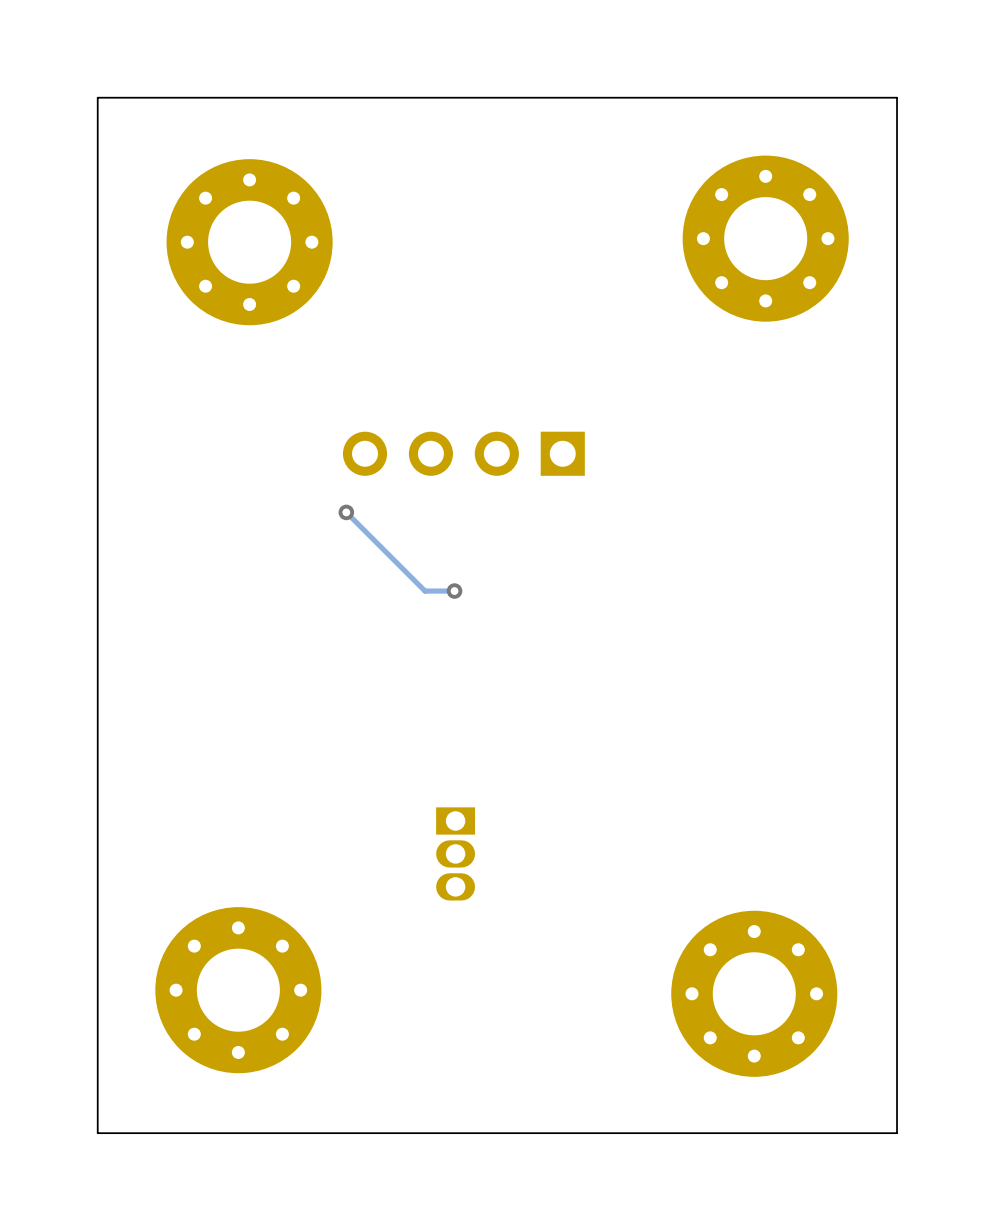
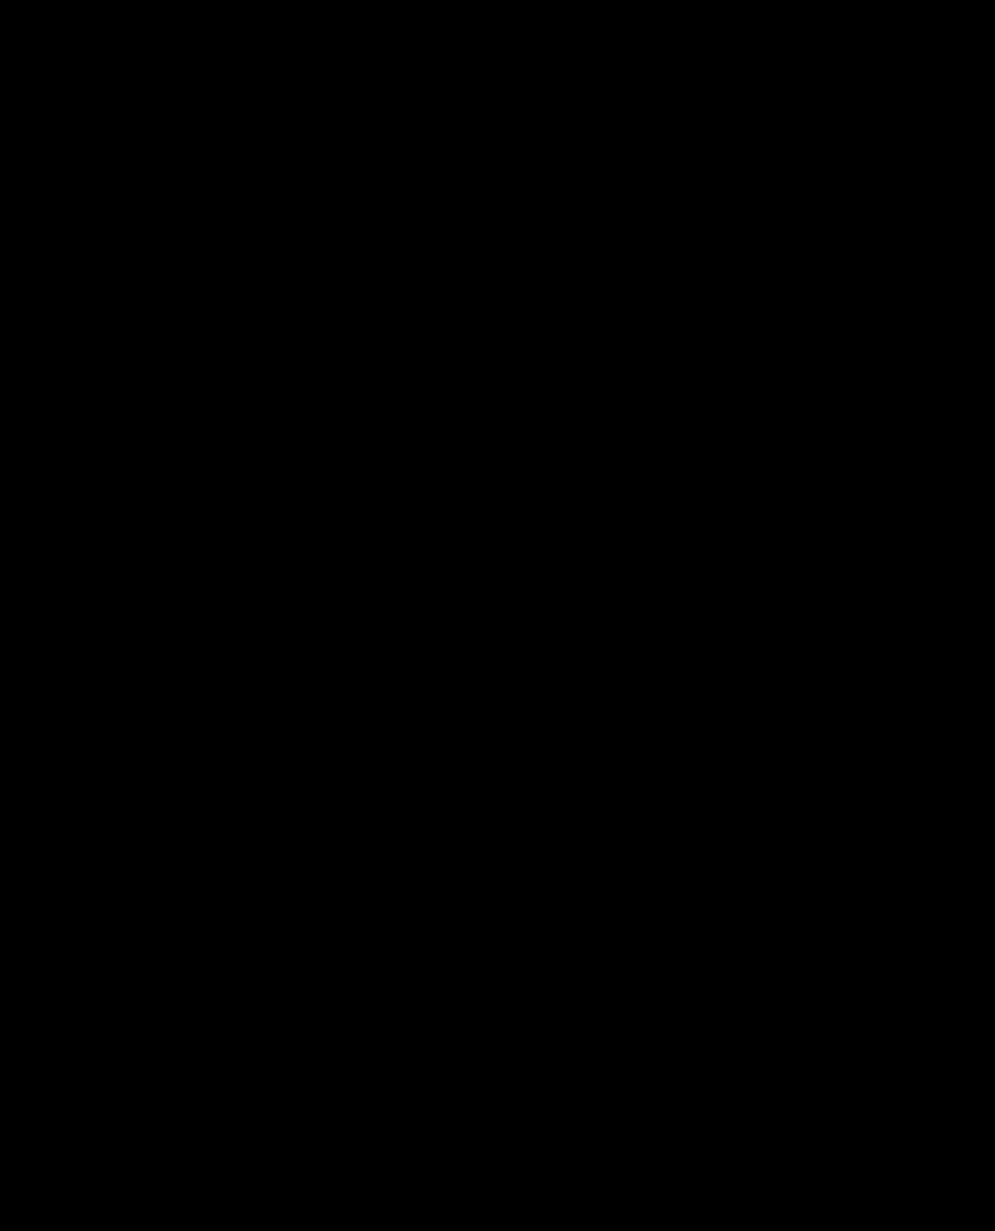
board edge: (897, 97) (97, 97) (97, 1133) (897, 1133) (897, 97) -> none
part: (765, 238) -> none
part: (249, 242) -> none
part: (463, 453) -> none
track: (346, 512) (424, 591) (454, 591) -> none
via: (346, 512) -> none
via: (454, 591) -> none
part: (455, 853) -> none
part: (238, 990) -> none
part: (754, 993) -> none

